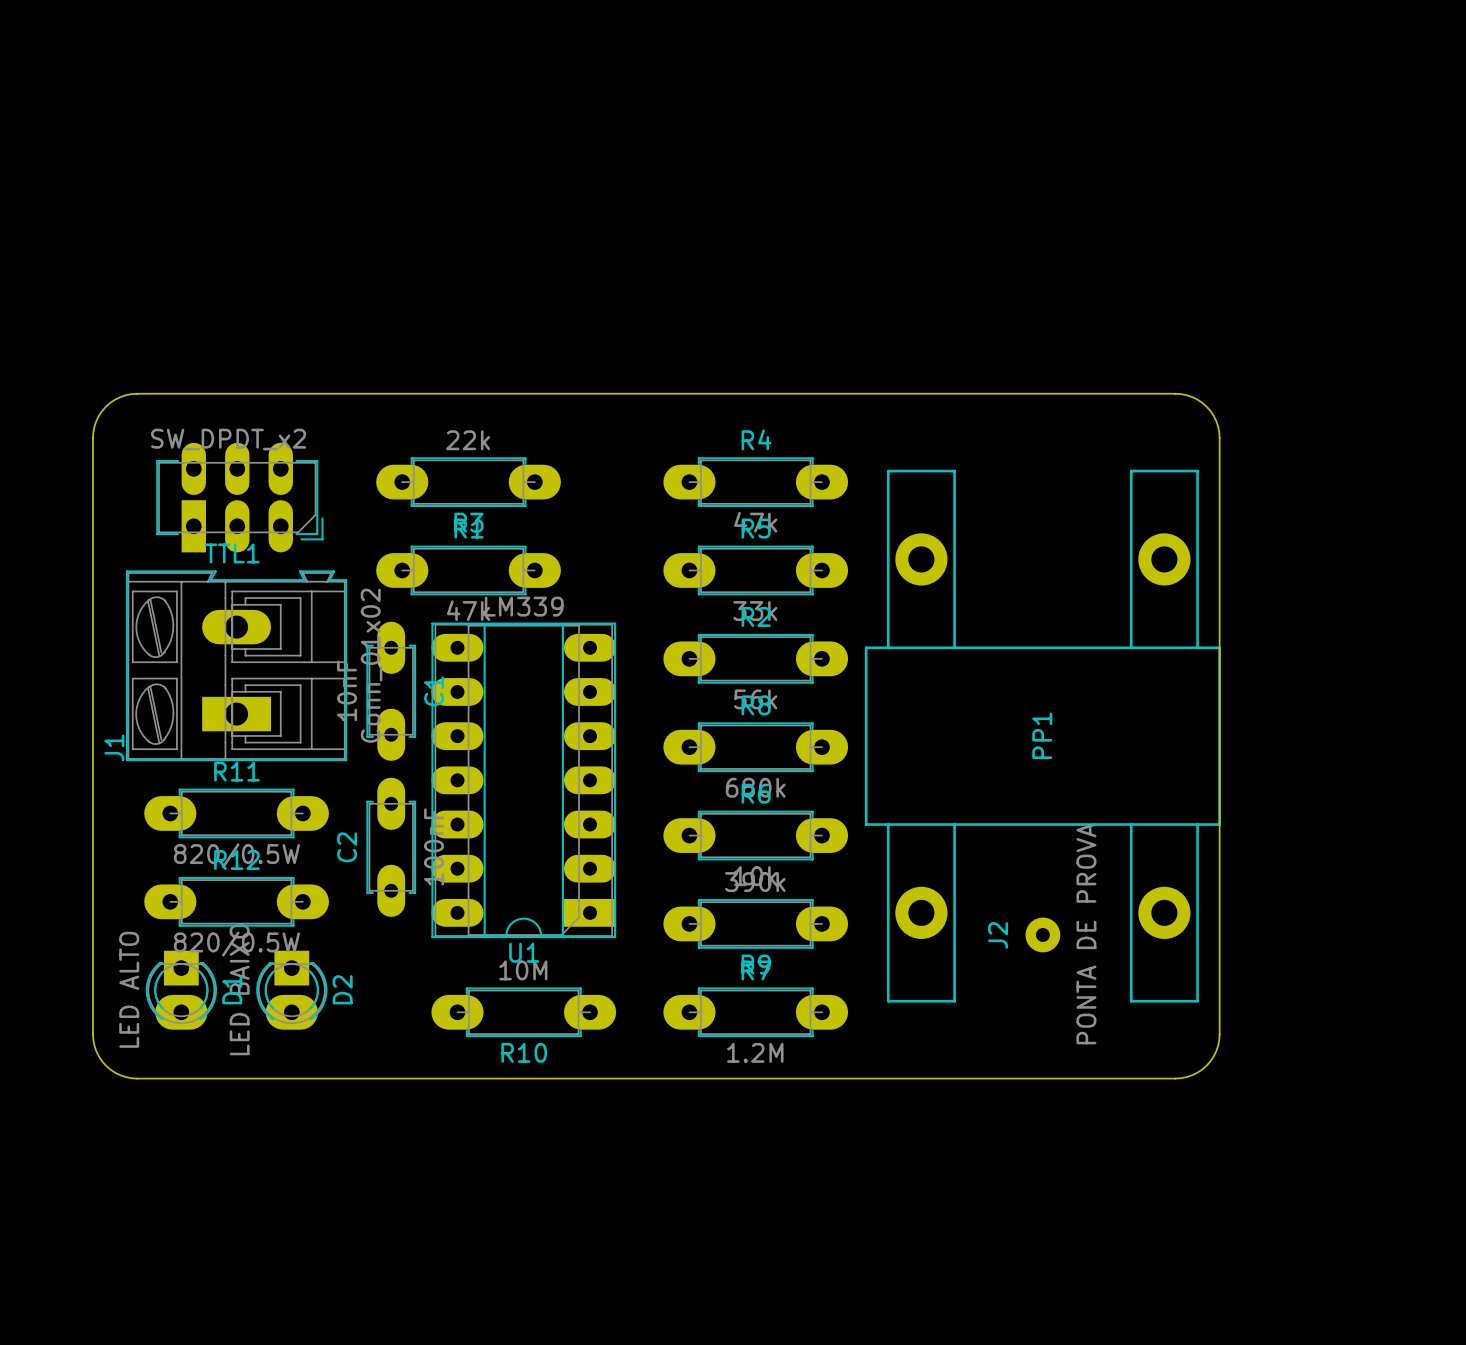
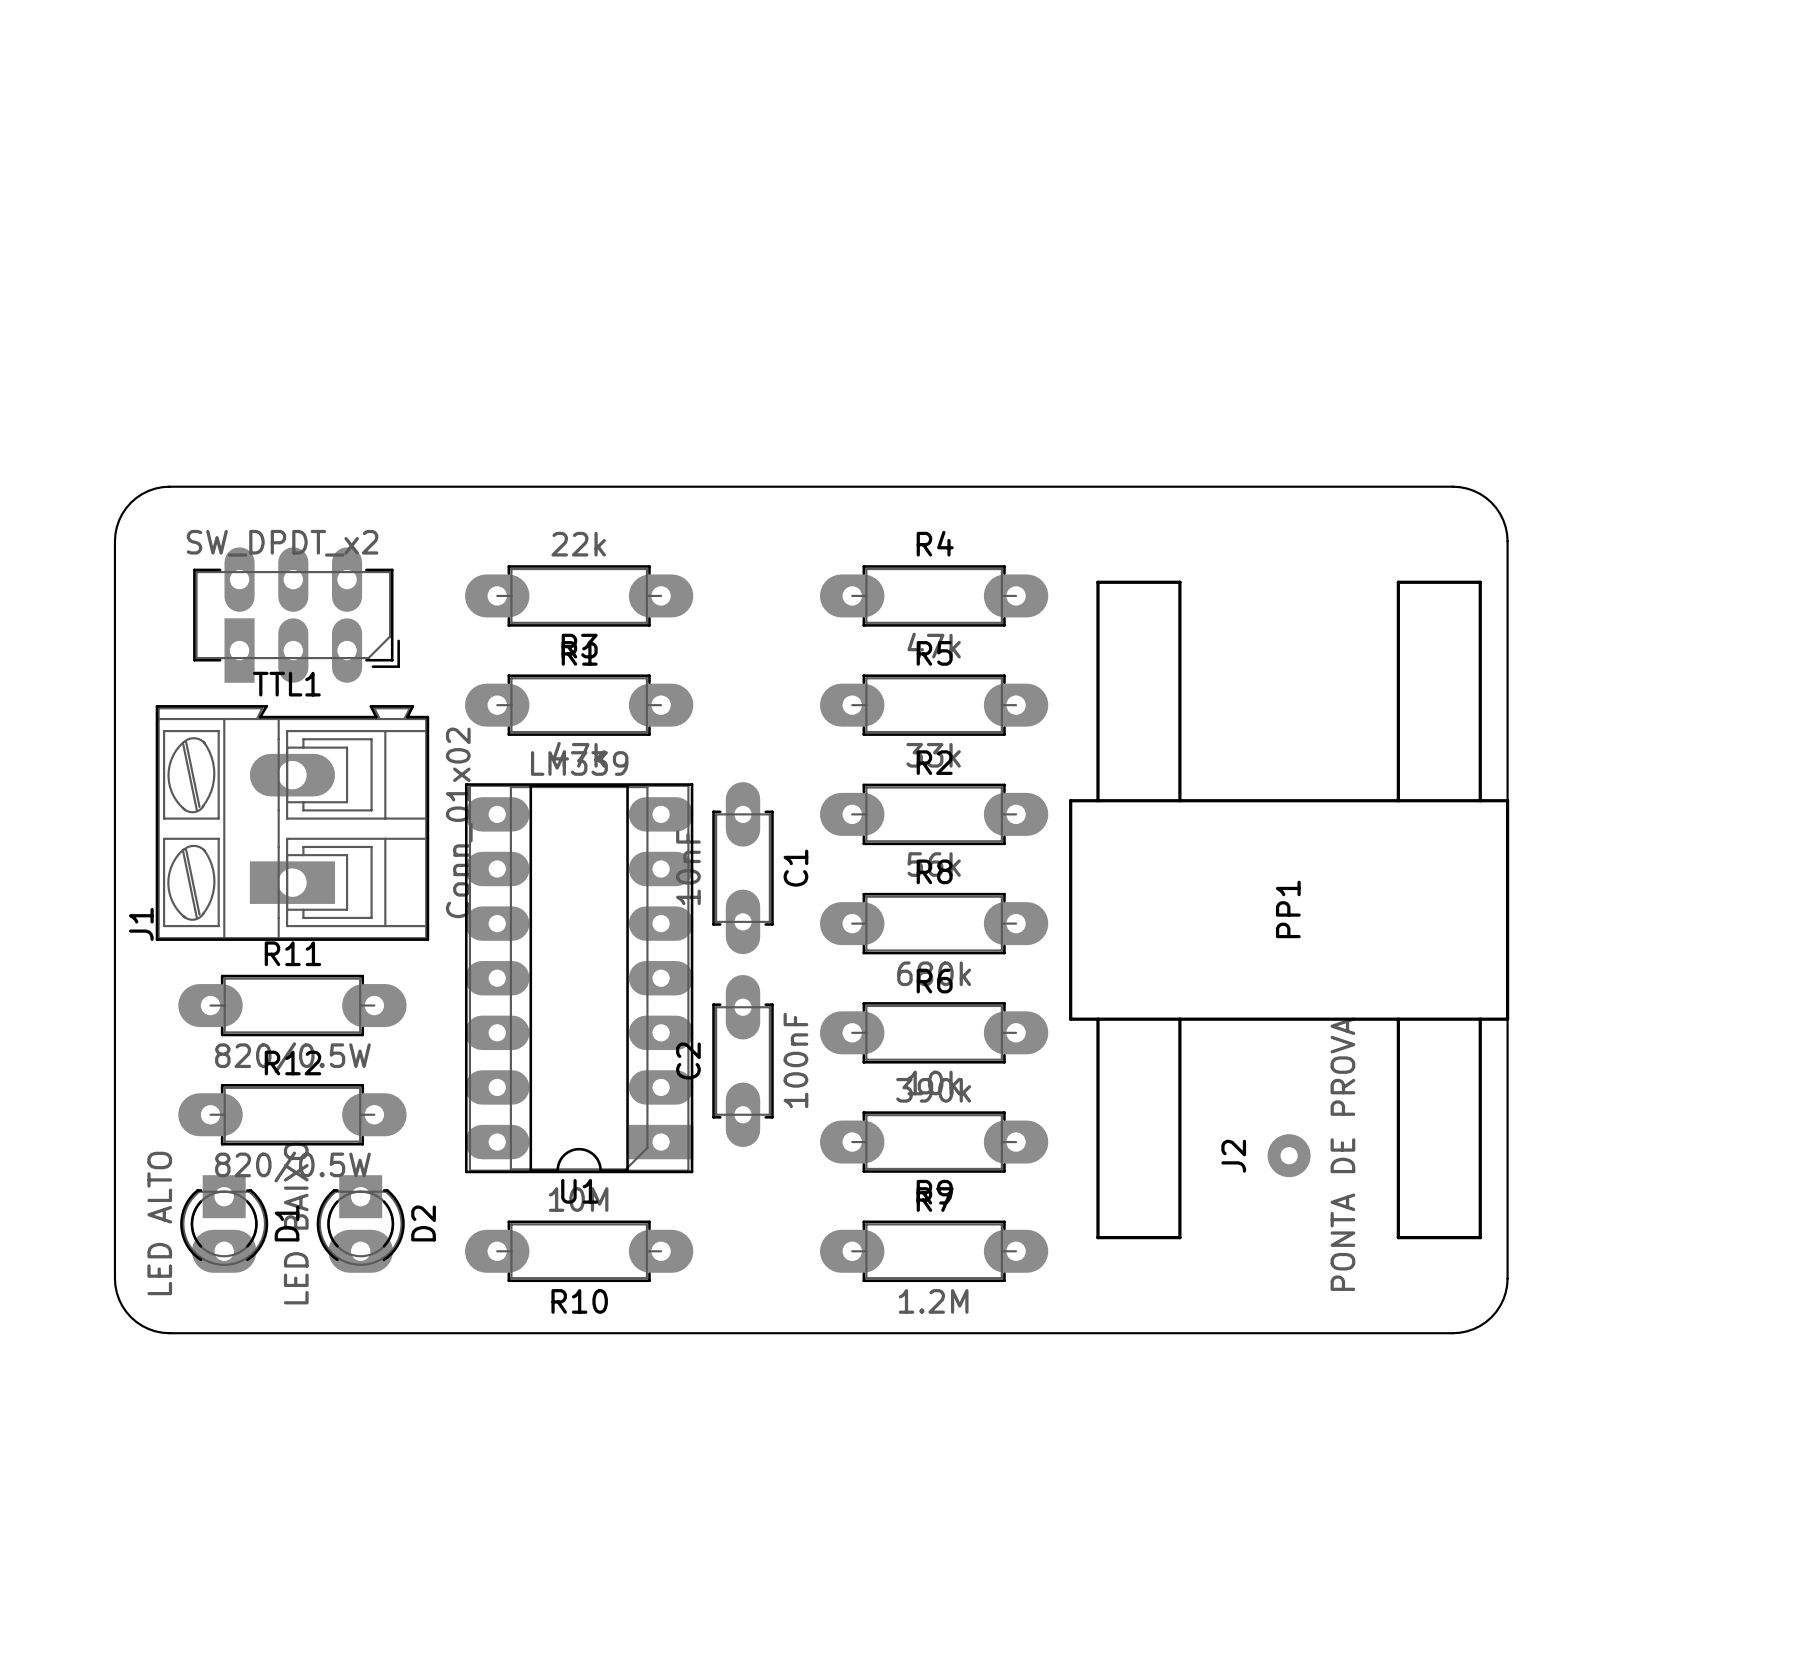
PP1 footprint: [864, 469, 1221, 1003] -> [1069, 580, 1510, 1240]
C1 position: (391, 691) -> (743, 868)
U1 position: (523, 780) -> (579, 978)
C2 position: (391, 847) -> (743, 1061)
R10 position: (523, 1012) -> (579, 1251)

